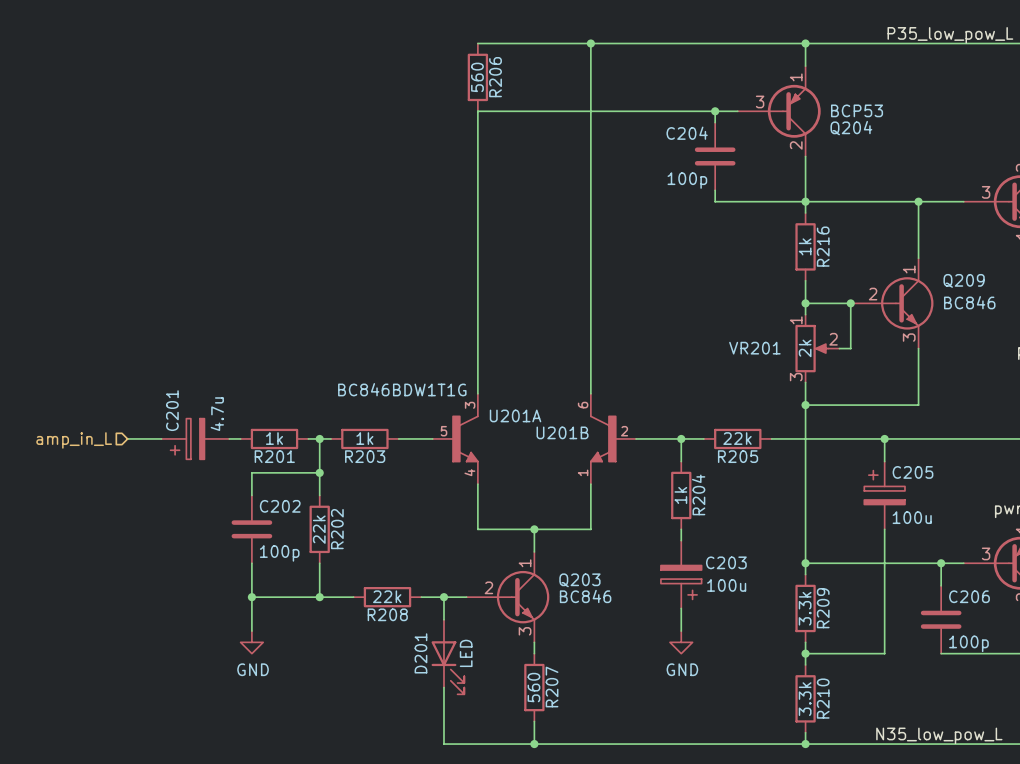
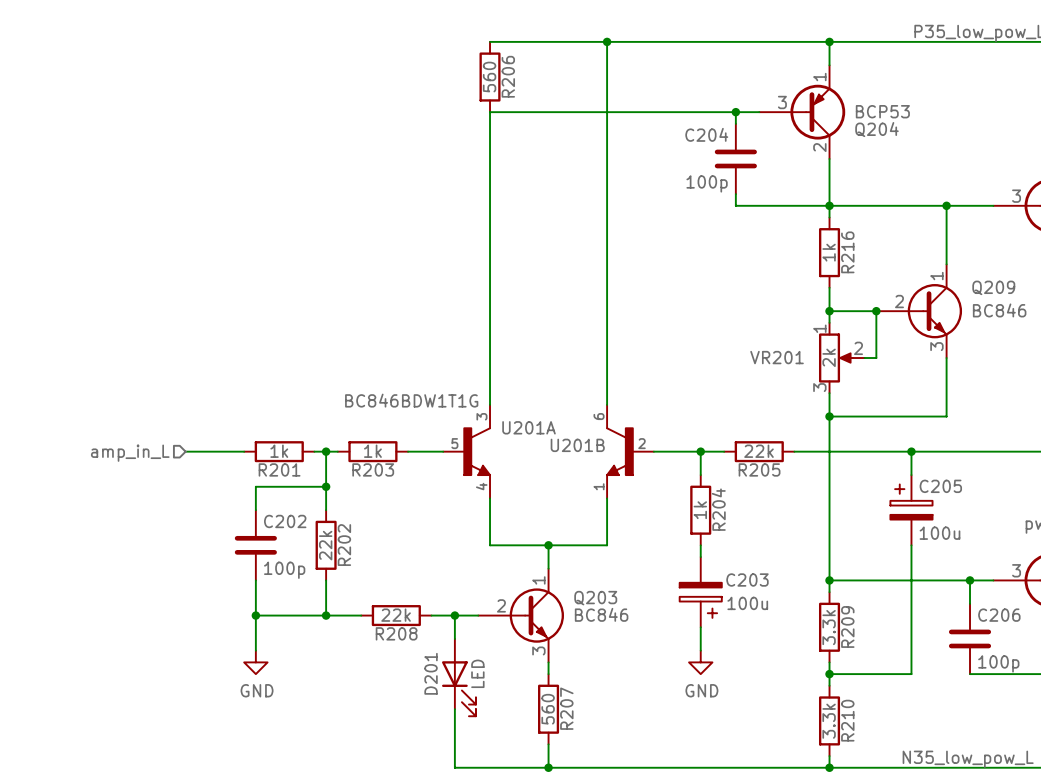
wire: (127, 438) (161, 438) -> none
C201: 4.7u (195, 438) -> none
hierarchical label position: amp_in_L (74, 440) -> amp_in_L (130, 453)

